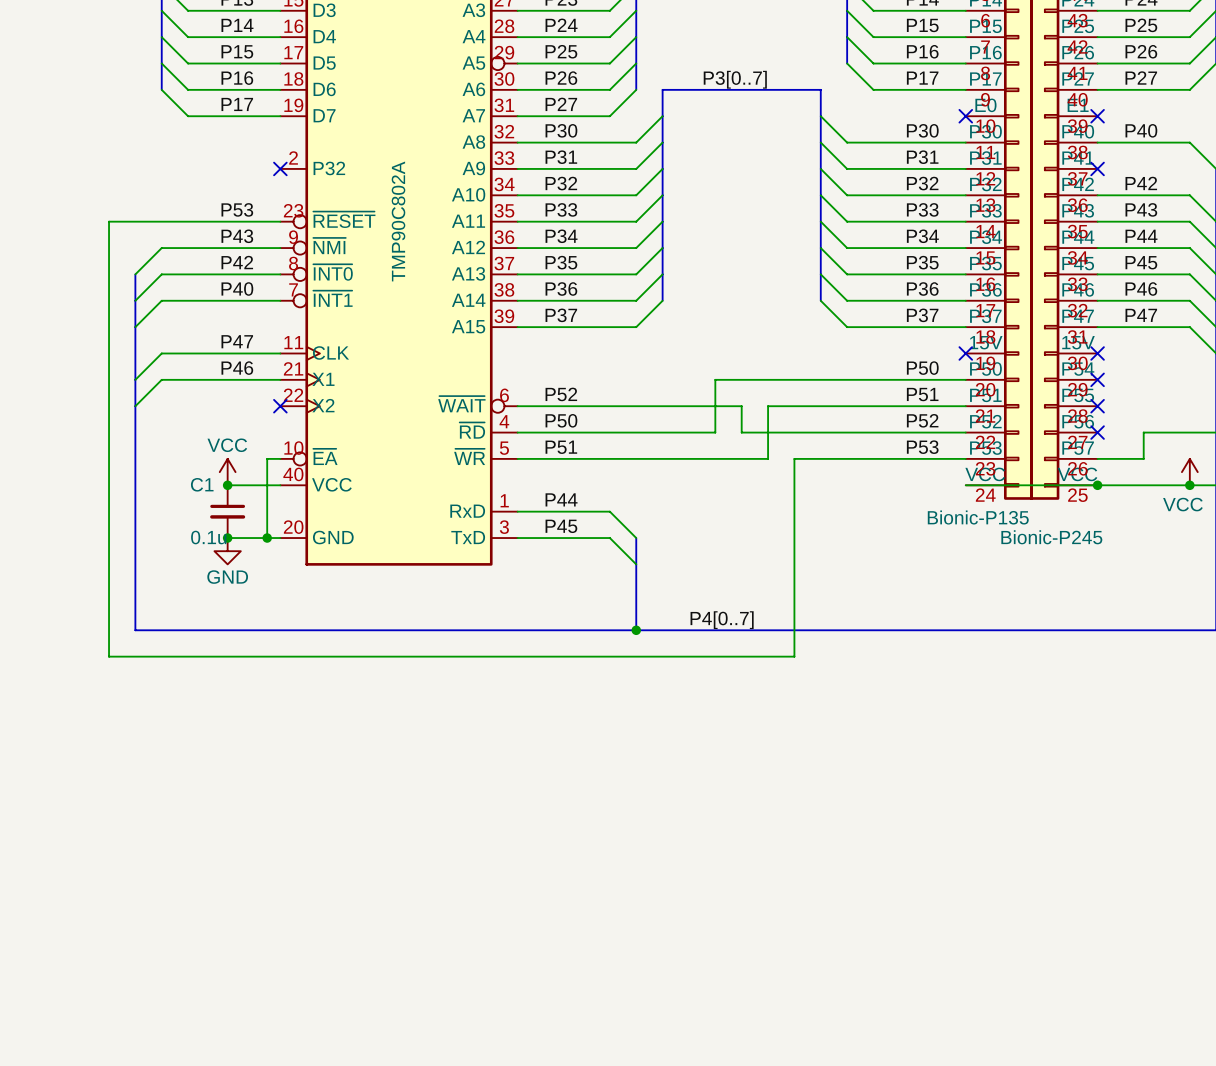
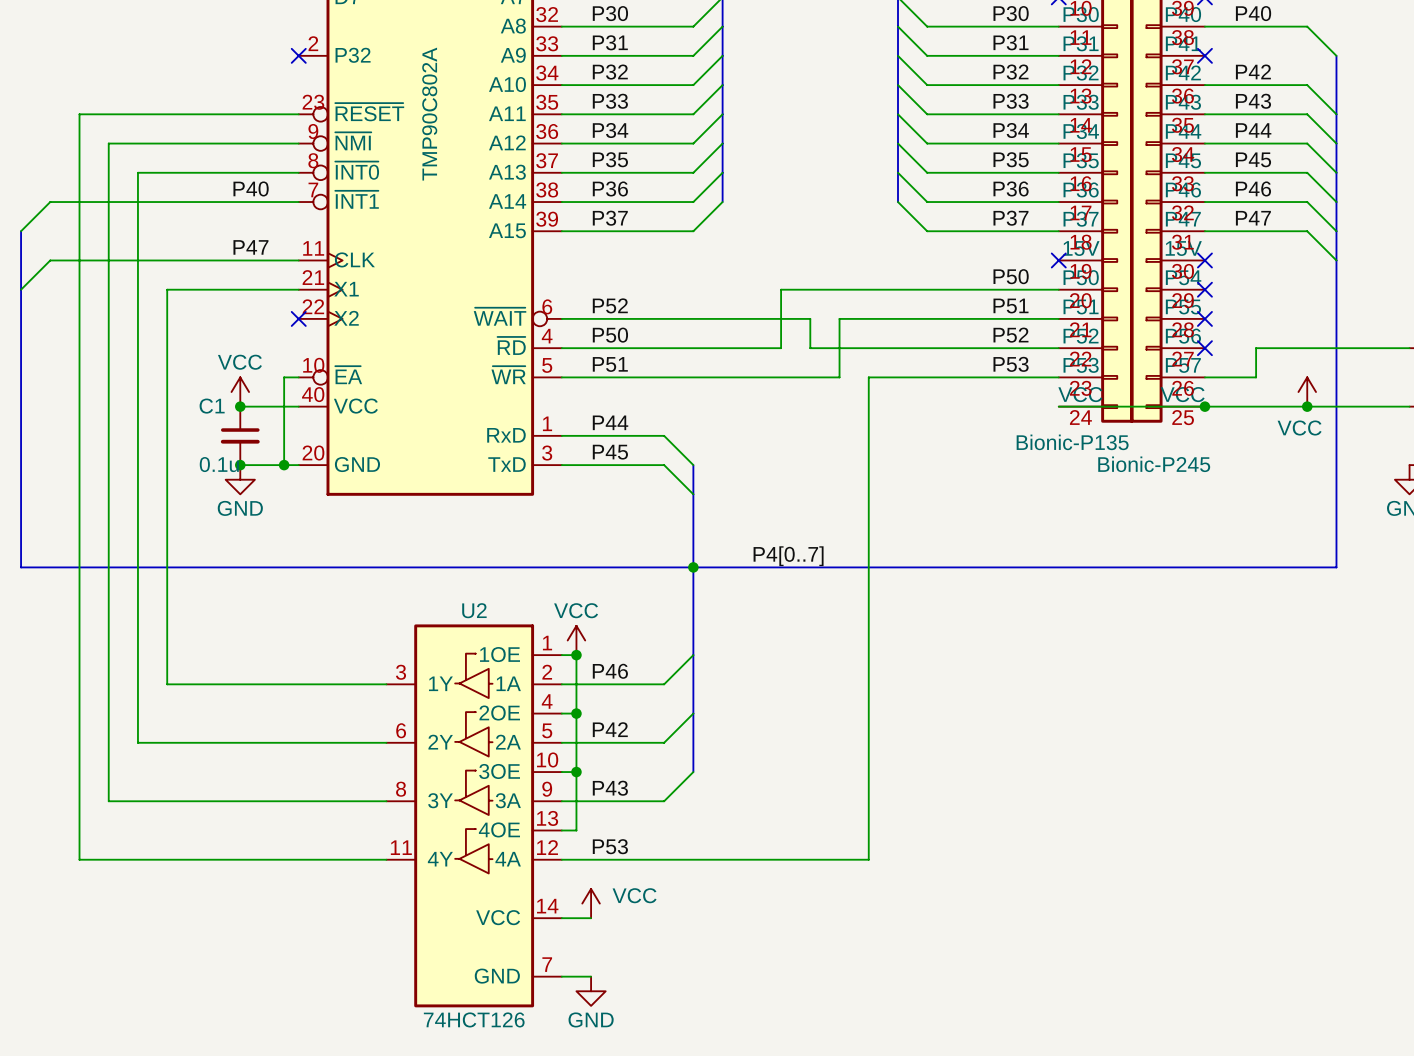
label: P53 (237, 209) -> none
wire: (109, 221) (109, 248) -> (108, 114) (79, 114) (79, 859) (386, 859)
label: P43 (237, 236) -> none
wire: (161, 248) (135, 274) -> (167, 143) (108, 143)
label: P42 (237, 262) -> none
bus: (135, 274) (135, 630) -> (21, 231) (21, 567) (137, 567)
wire: (161, 274) (135, 300) -> (167, 172) (137, 172) (137, 742) (386, 742)
wire: (161, 300) (135, 327) -> (167, 202) (50, 202) (21, 231)
wire: (161, 353) (135, 379) -> (167, 260) (50, 260) (21, 289)
label: P46 (237, 368) -> none
wire: (161, 379) (135, 406) -> (167, 289) (167, 684) (386, 684)
bus: none -> (693, 567) (693, 772)
wire: (109, 656) (794, 656) -> (108, 596) (108, 801) (386, 801)
wire: none -> (868, 596) (868, 859) (561, 859)
power symbol: none -> VCC (576, 640)
wire: none -> (561, 655) (576, 655) (576, 830) (561, 830)
junction: none -> (576, 655)
wire: none -> (693, 655) (664, 684) (561, 684)
label: none -> P46 (610, 671)
wire: none -> (561, 713) (576, 713)
junction: none -> (576, 713)
wire: none -> (693, 713) (664, 742) (561, 742)
label: none -> P42 (610, 729)
wire: none -> (561, 772) (576, 772)
junction: none -> (576, 772)
wire: none -> (693, 772) (664, 801) (561, 801)
label: none -> P43 (610, 788)
U2: none -> 74HCT126 (474, 815)
label: none -> P53 (610, 846)
power symbol: none -> VCC (591, 903)
wire: none -> (561, 918) (591, 918)
wire: none -> (561, 976) (591, 976)
power symbol: none -> GND (591, 991)

